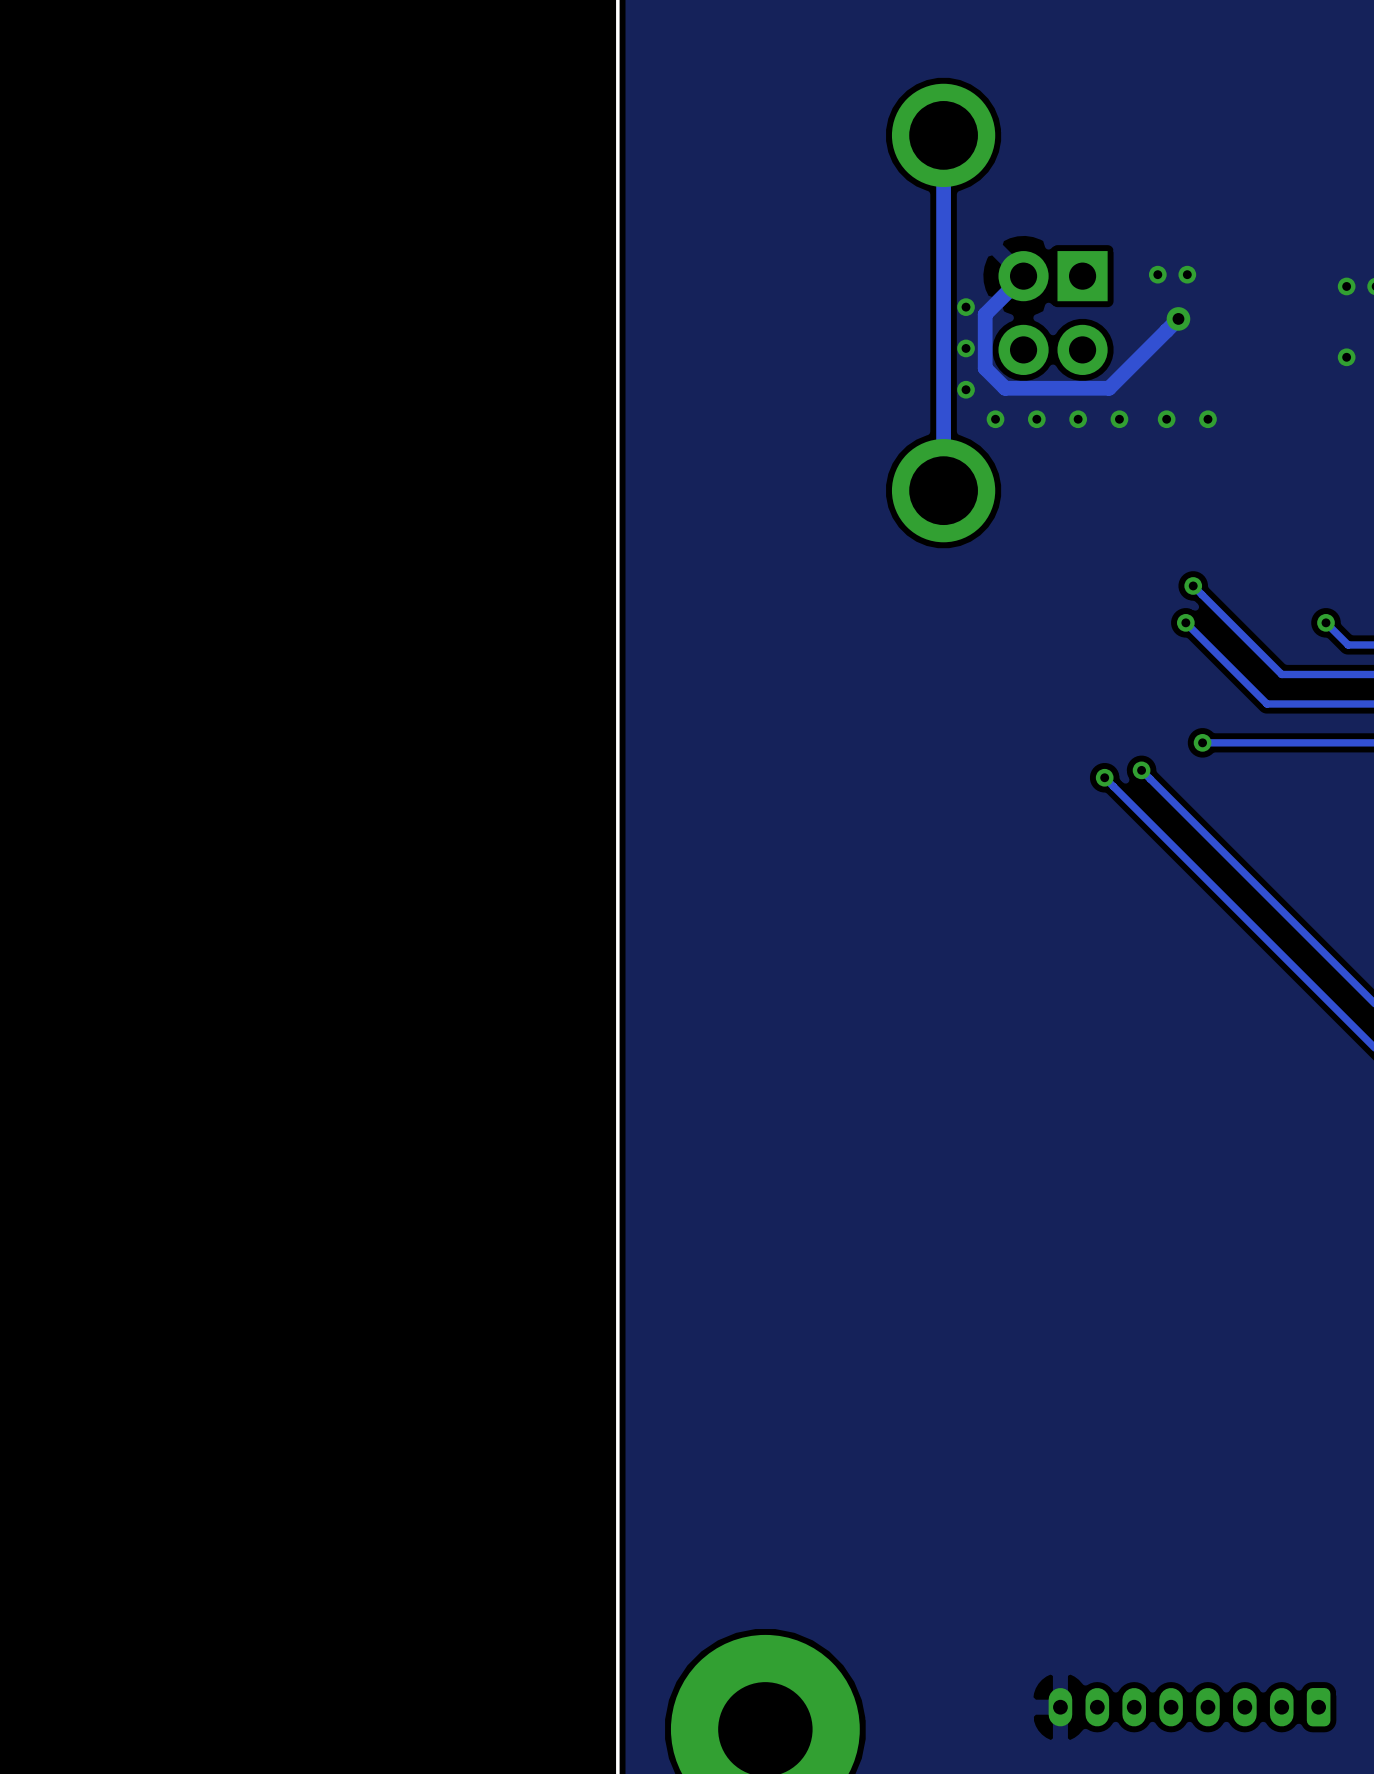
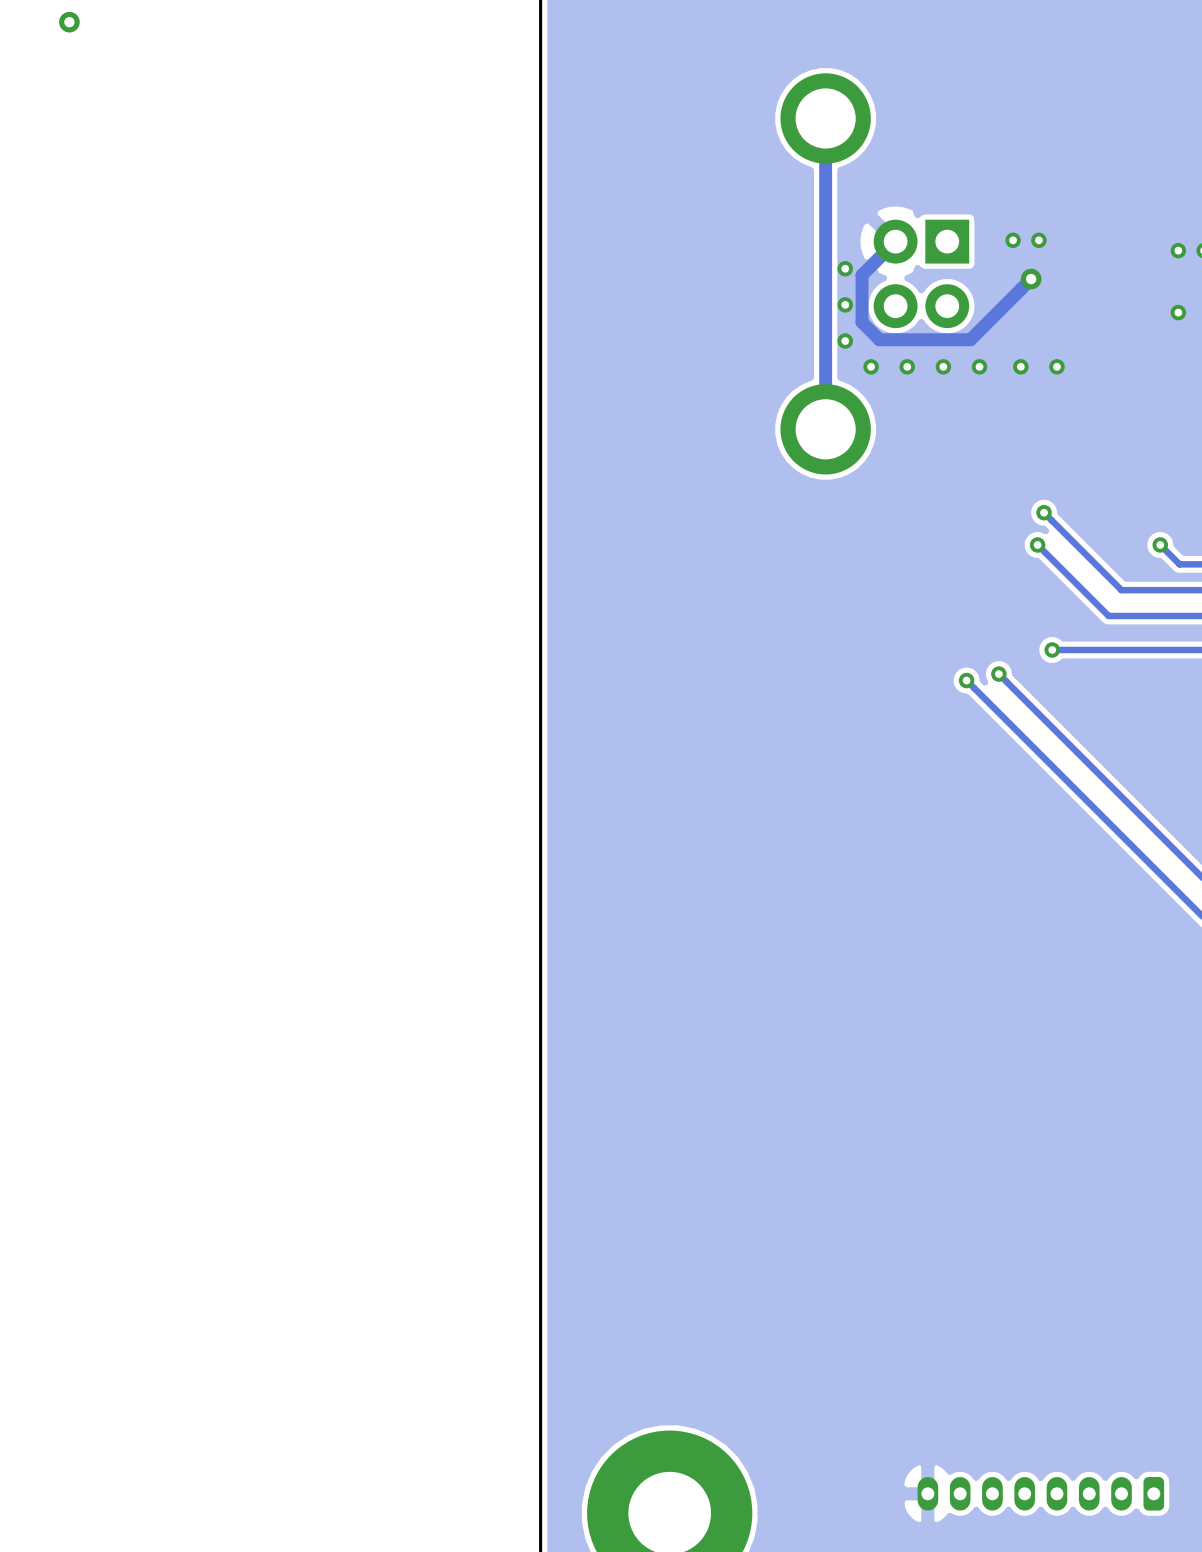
via: none -> (69, 22)

